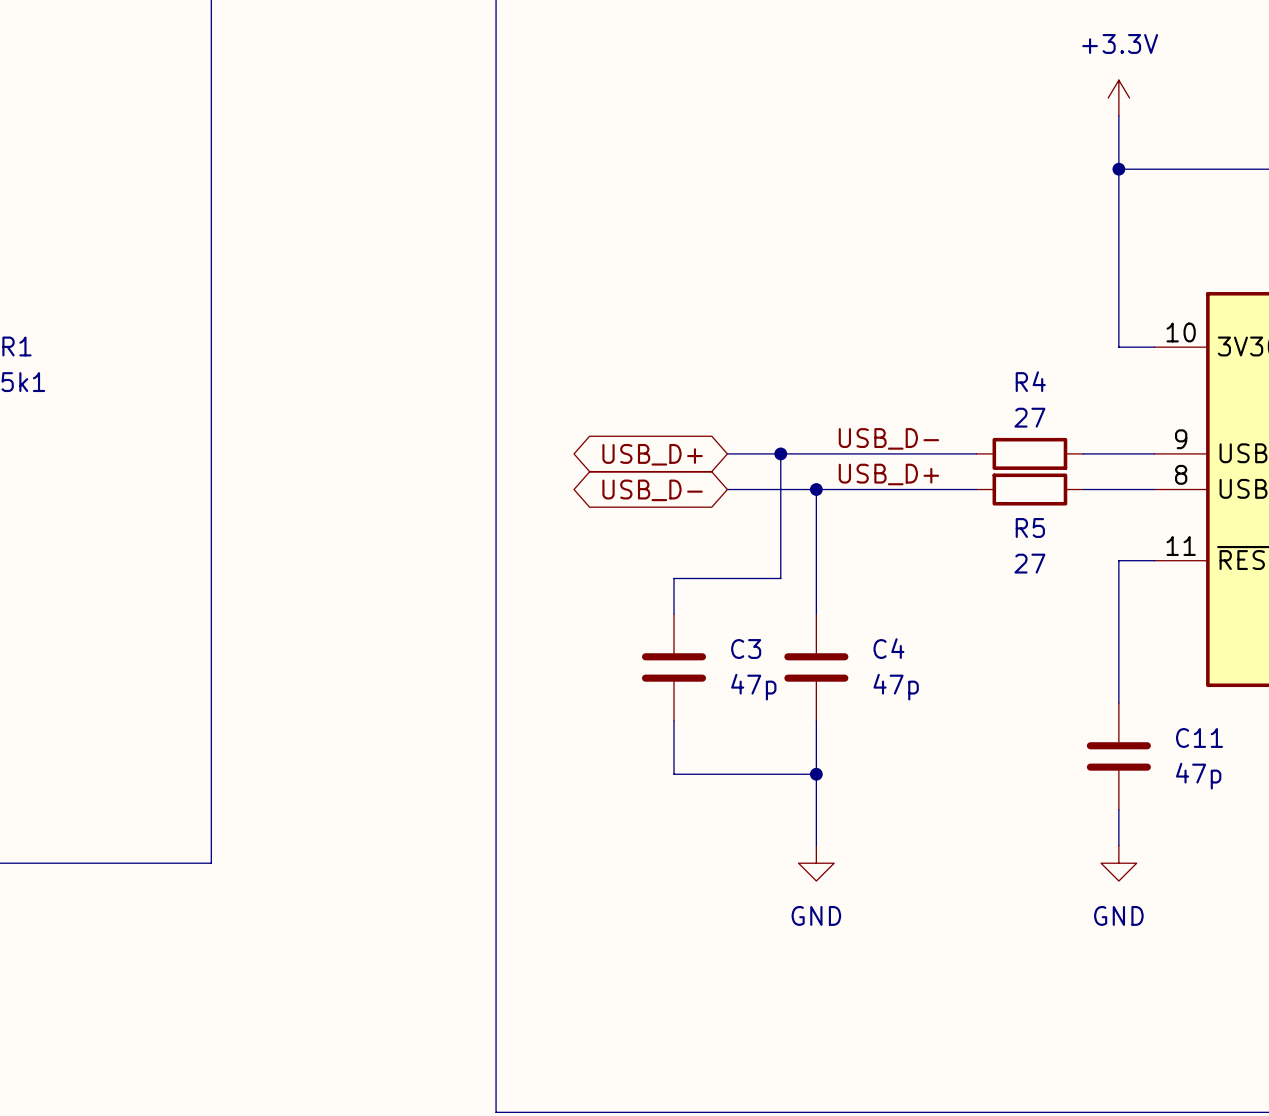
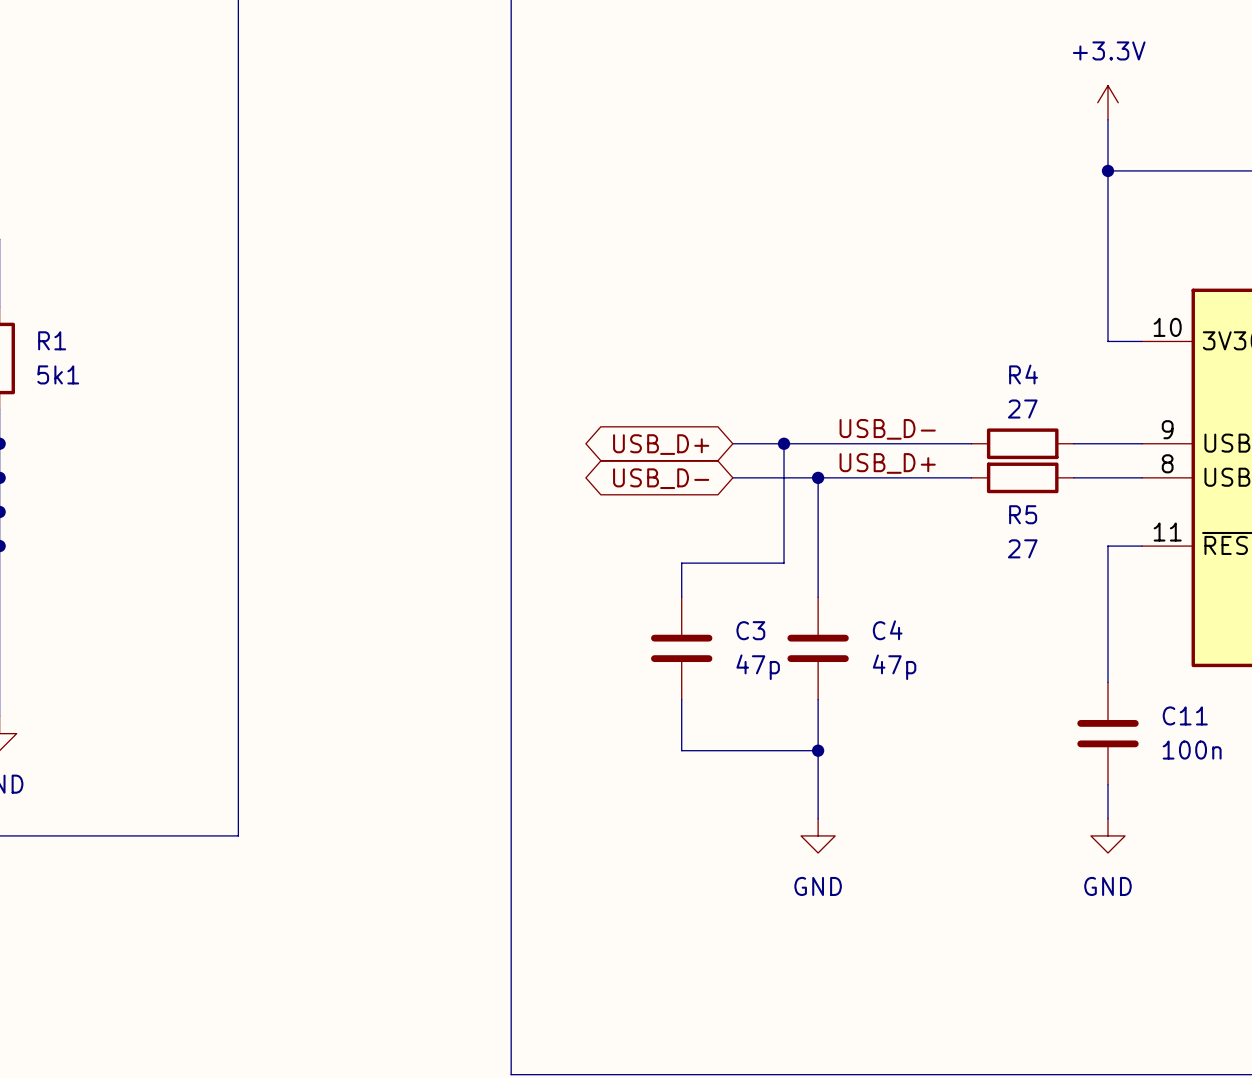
C11 value: 47p (1198, 776) -> 100n (1192, 750)

